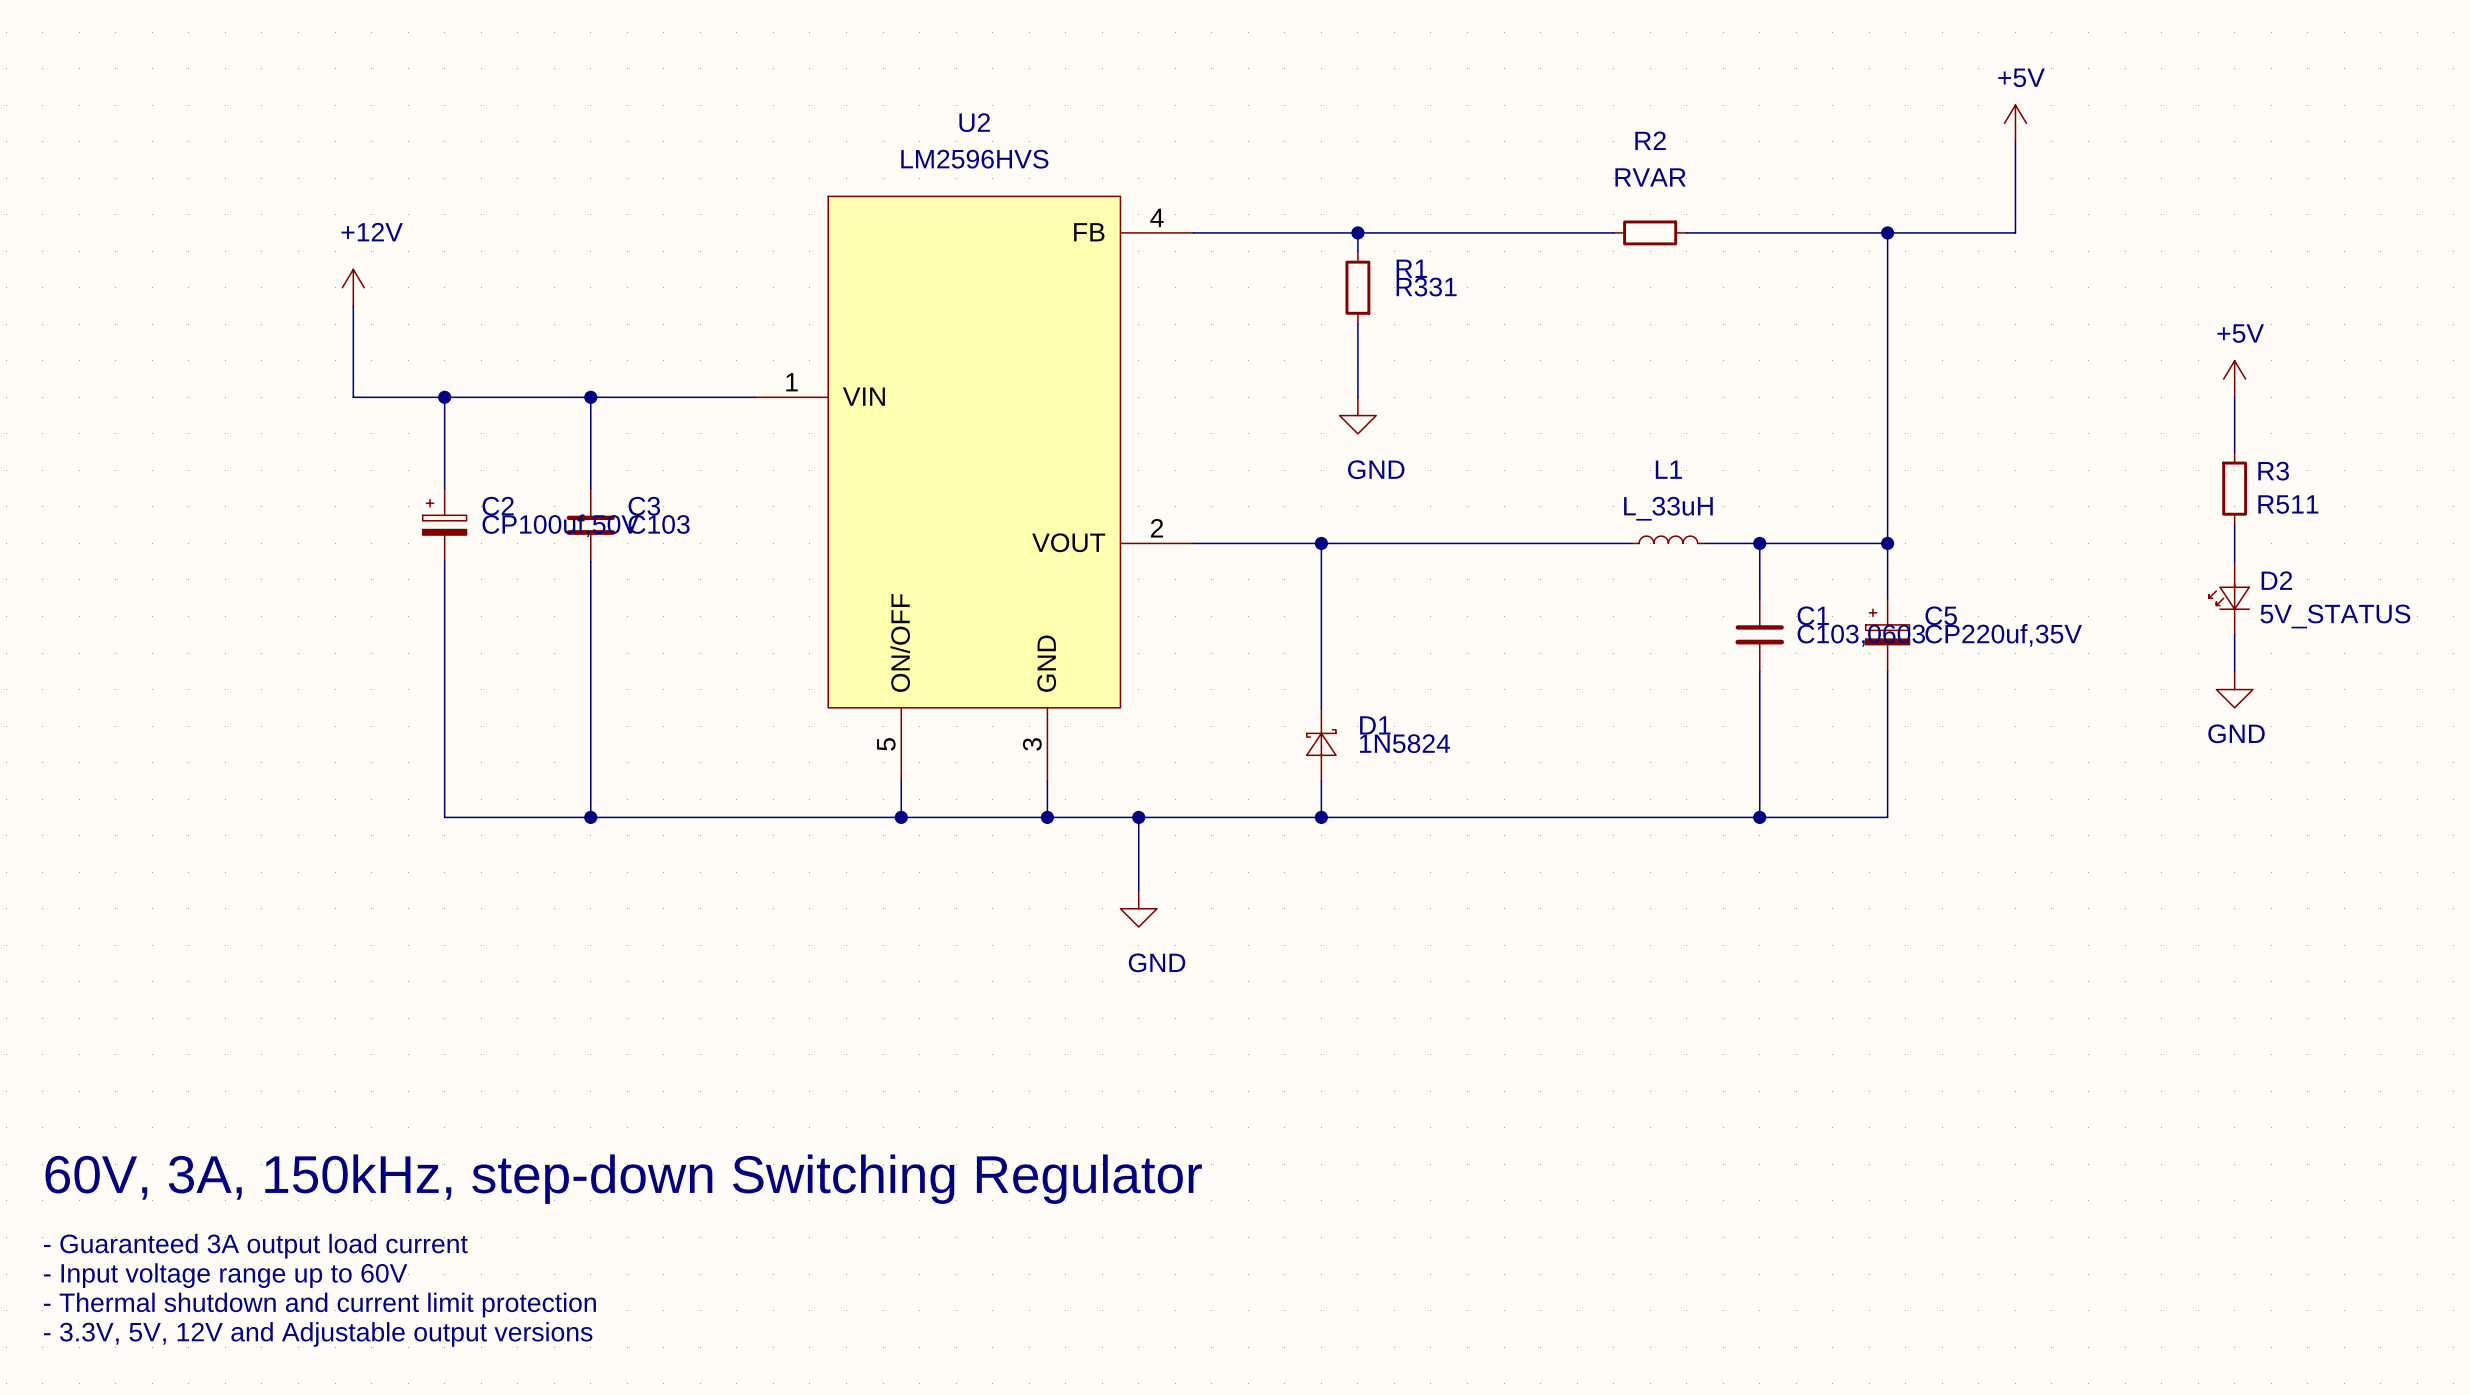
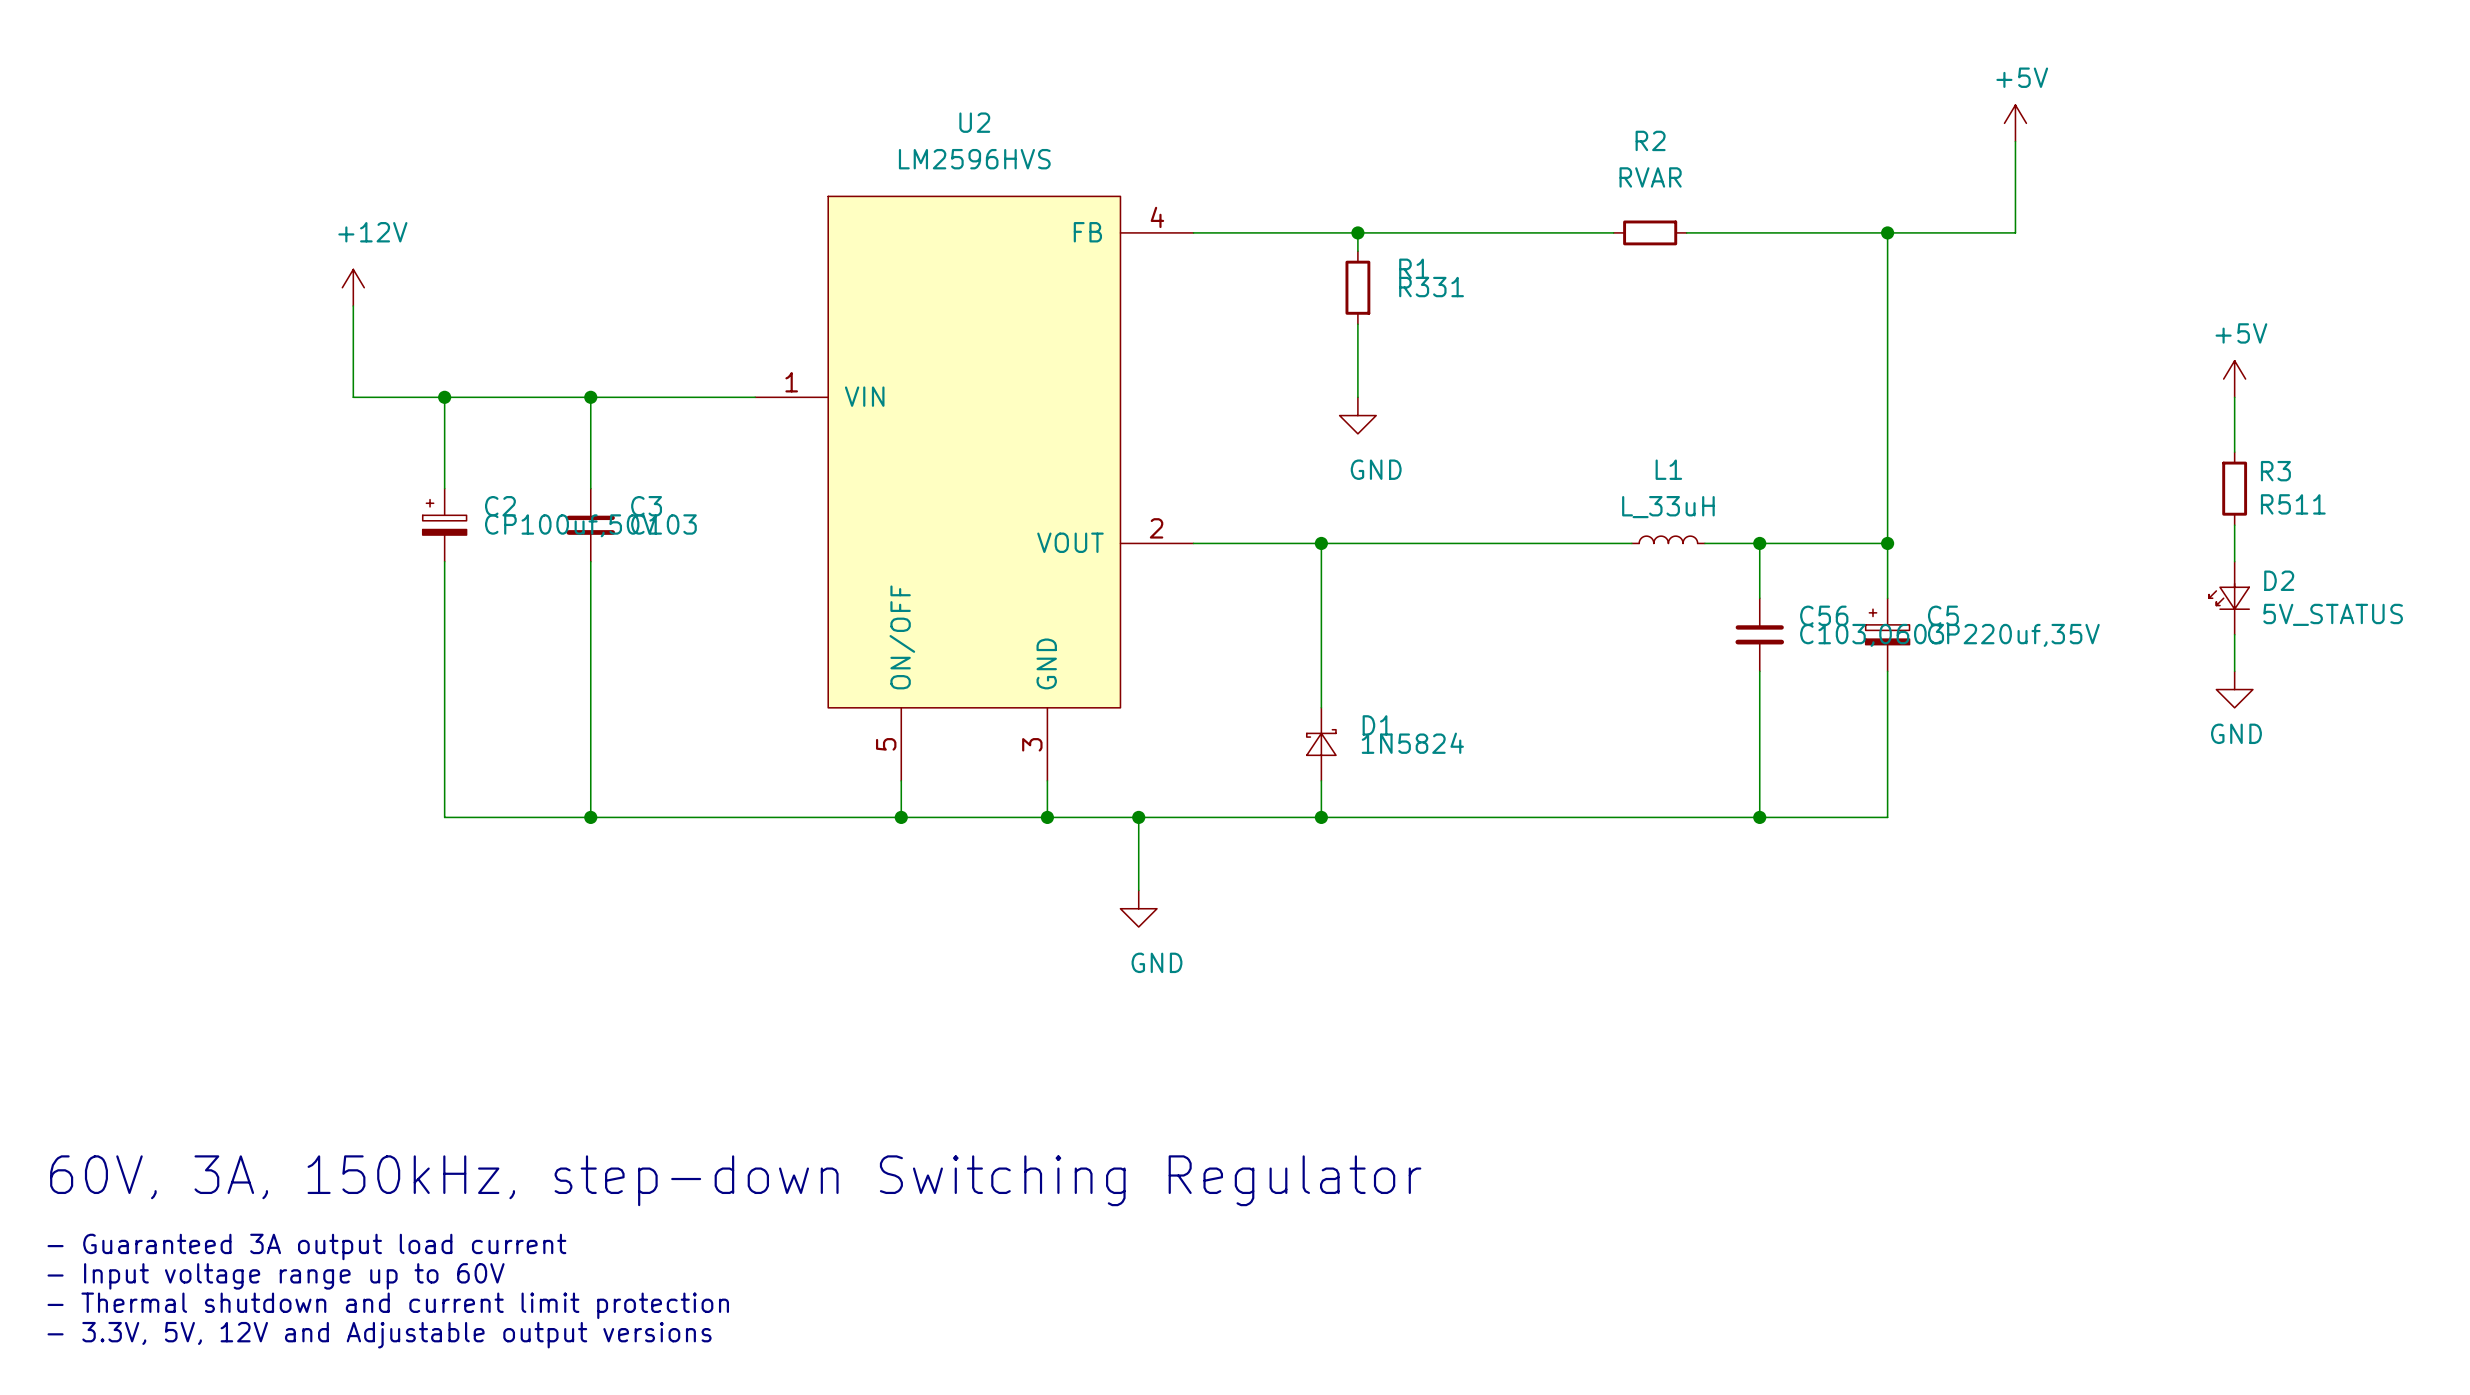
C1 name: C1 (1813, 615) -> C56 (1824, 615)

